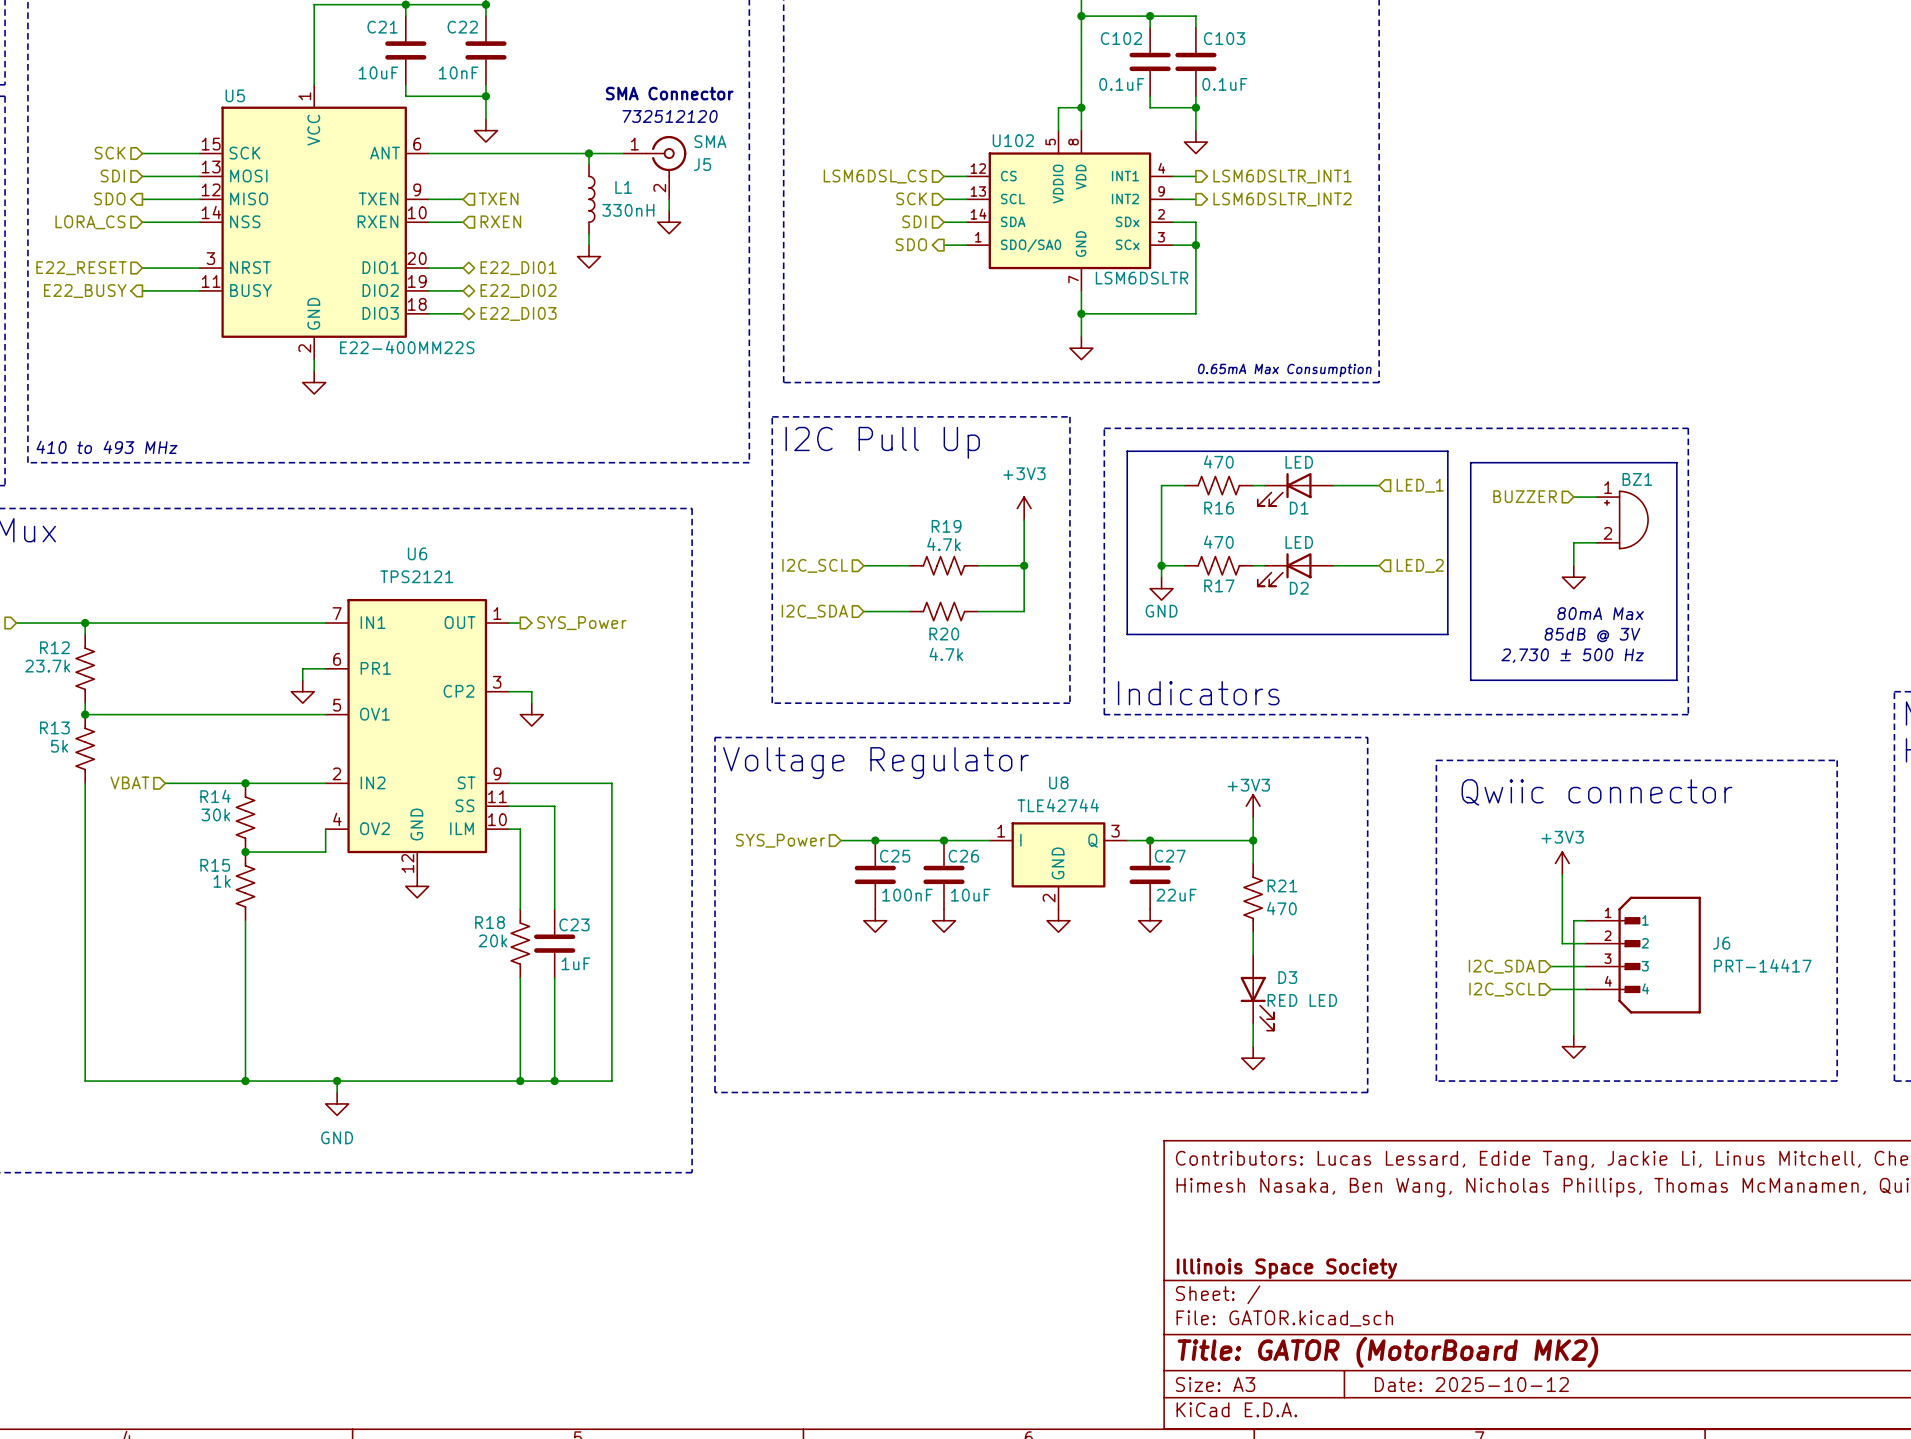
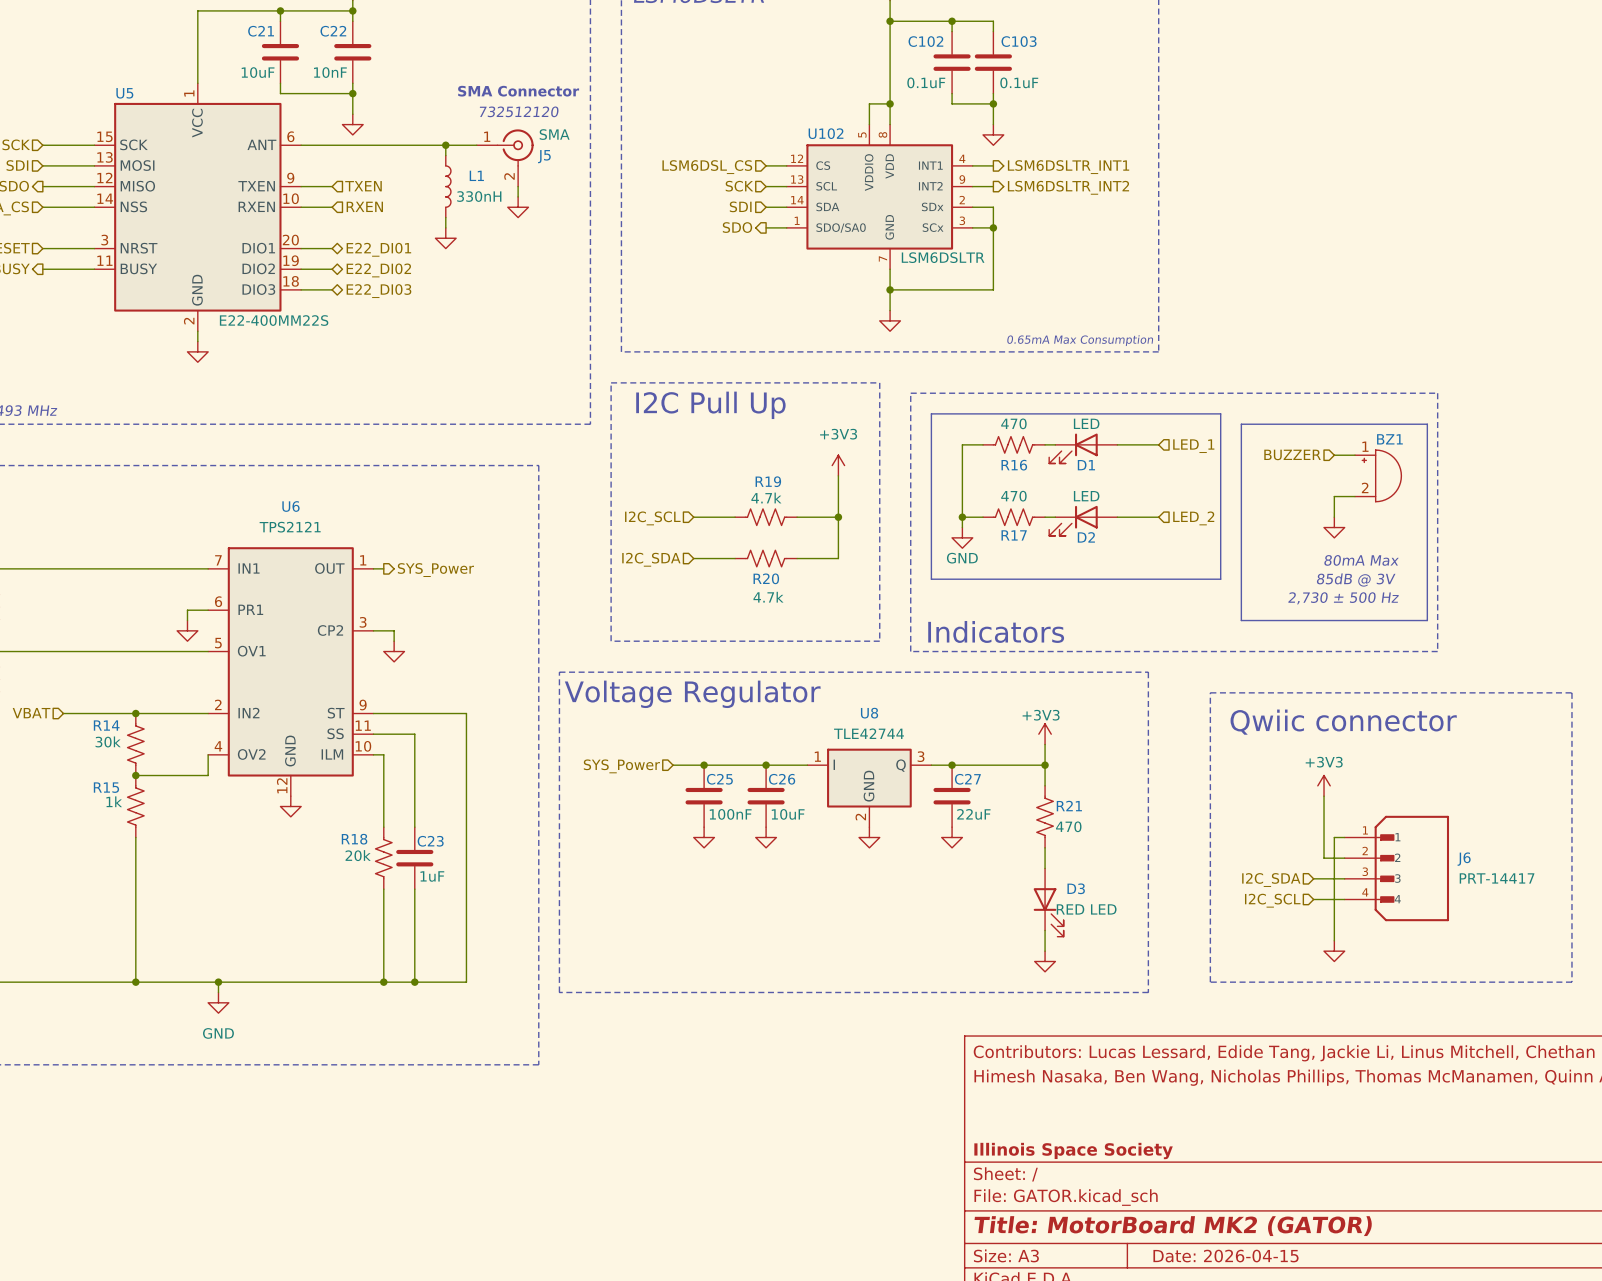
title block: Title: GATOR (MotorBoard MK2) (1387, 1352) -> Title: MotorBoard MK2 (GATOR) (1173, 1226)
title block: Date: 2025-10-12 (1471, 1384) -> Date: 2026-04-15 (1225, 1256)

